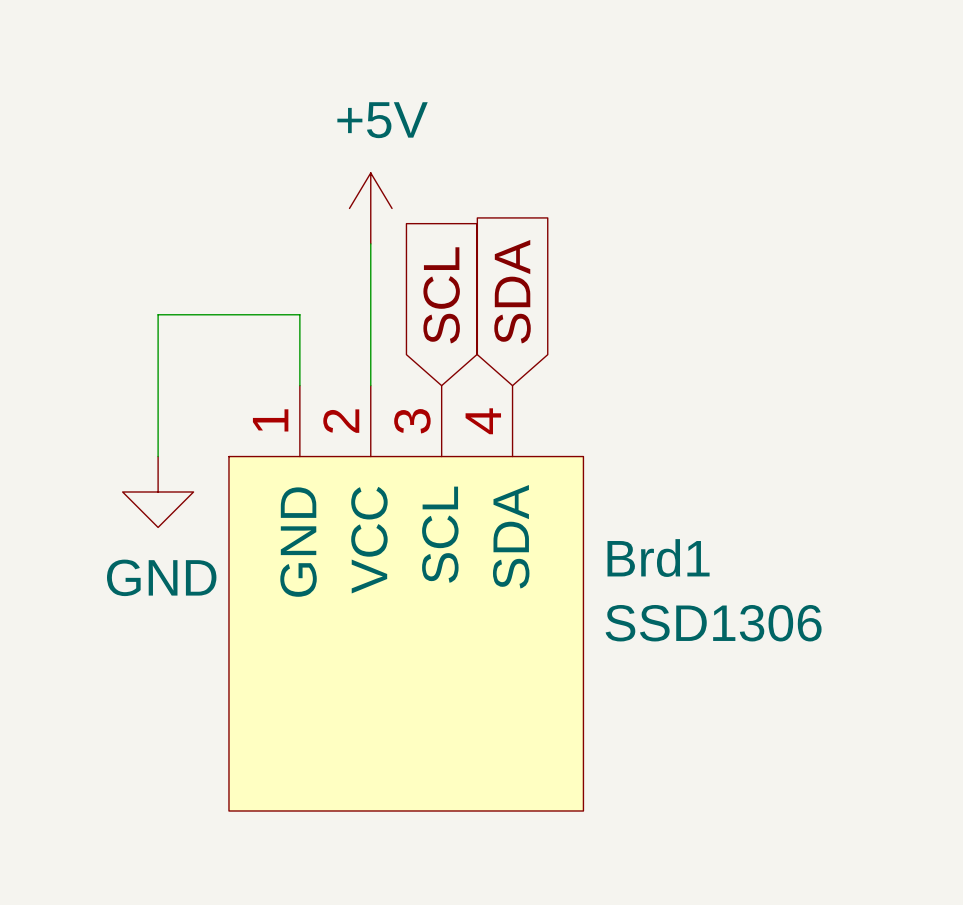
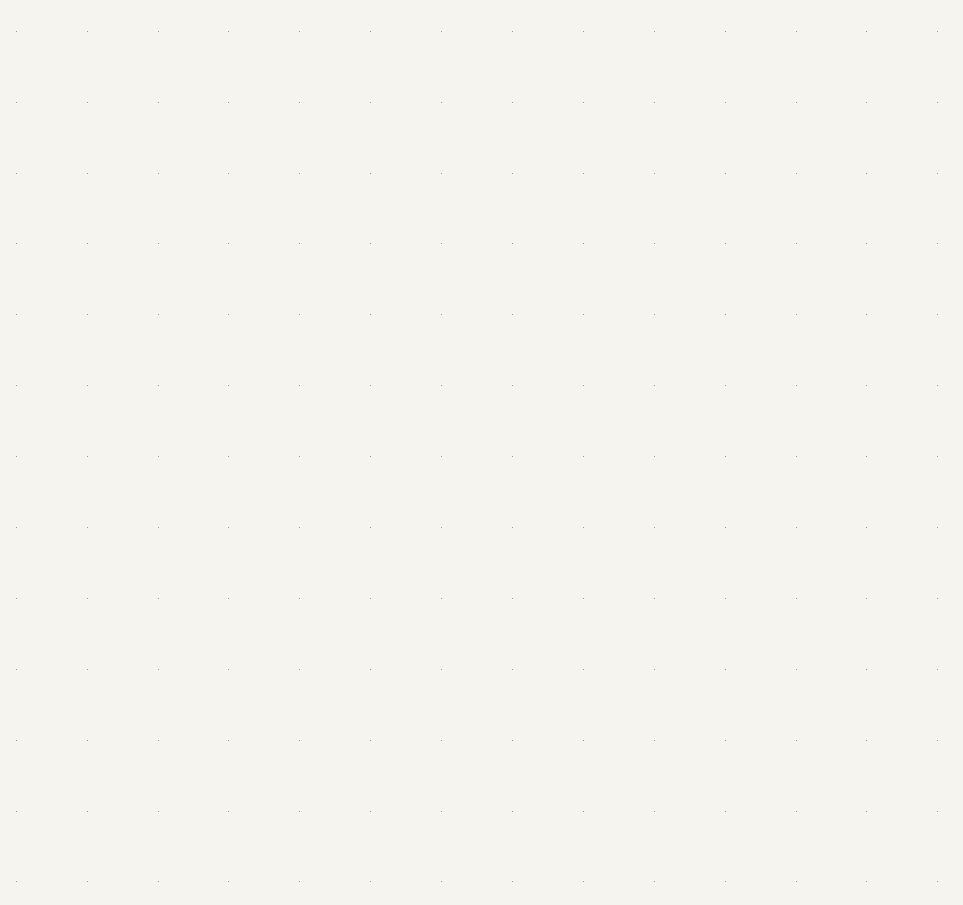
power symbol: +5V (370, 208) -> none
wire: (370, 243) (370, 385) -> none
global label: SDA (512, 291) -> none
global label: SCL (441, 295) -> none
wire: (299, 385) (299, 314) (158, 314) (158, 456) -> none
power symbol: GND (158, 492) -> none
Brd1: SSD1306 (406, 598) -> none

